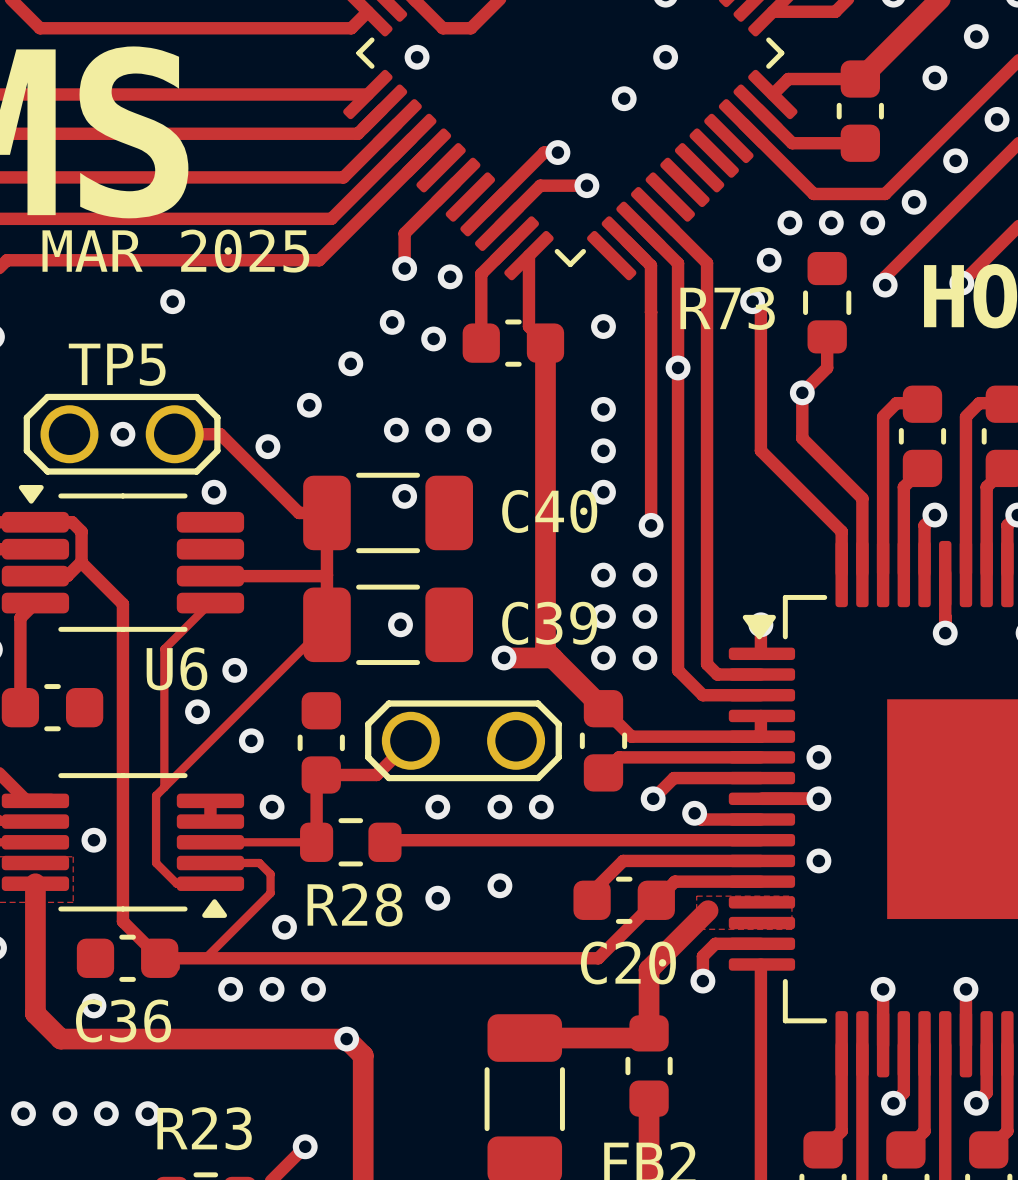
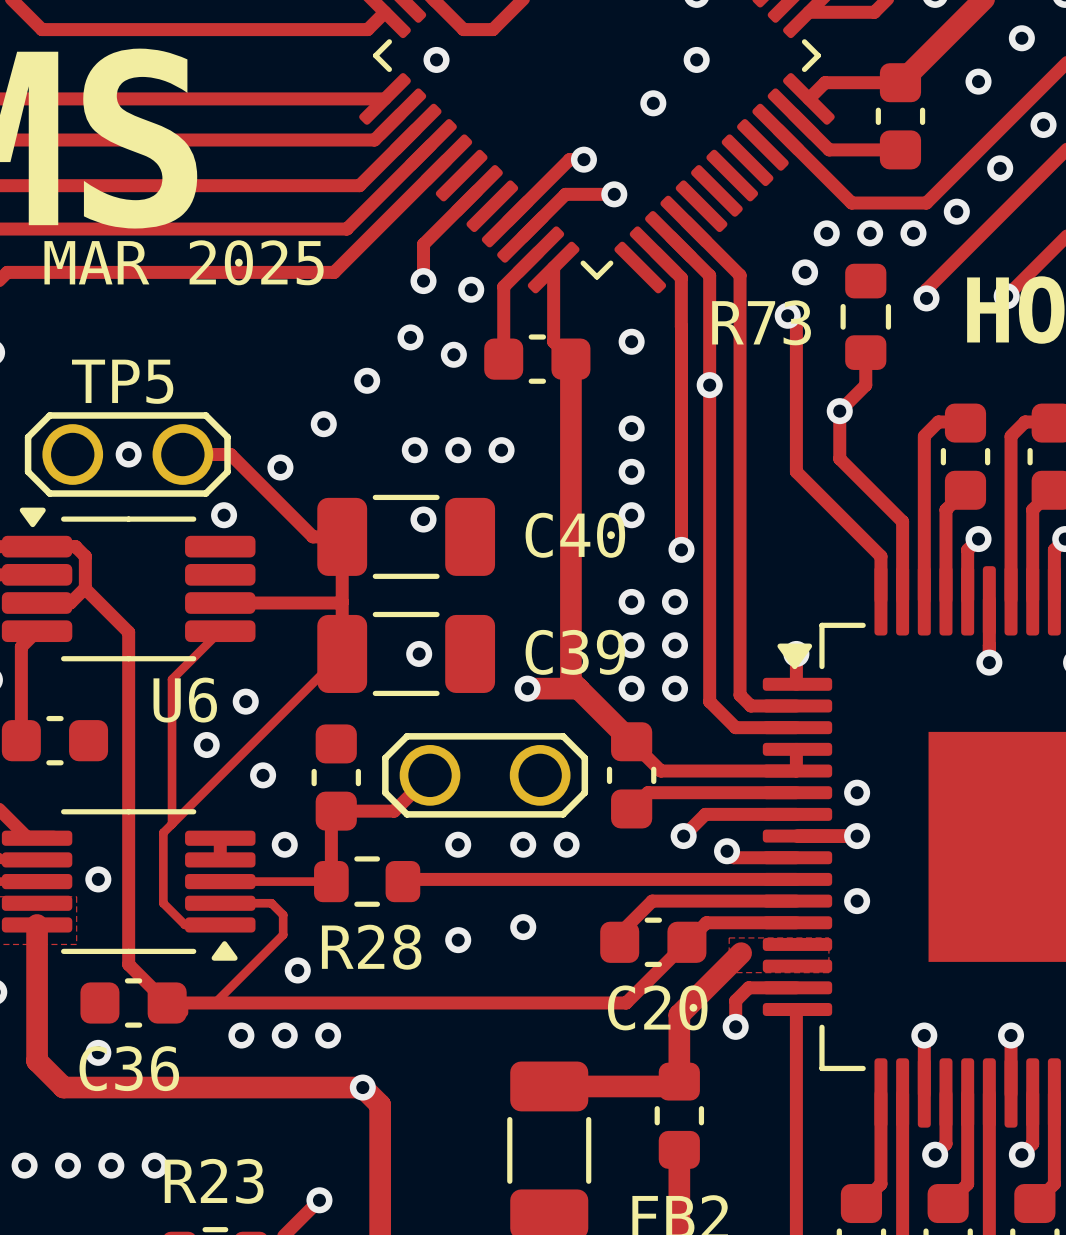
via: (172, 301) -> none

